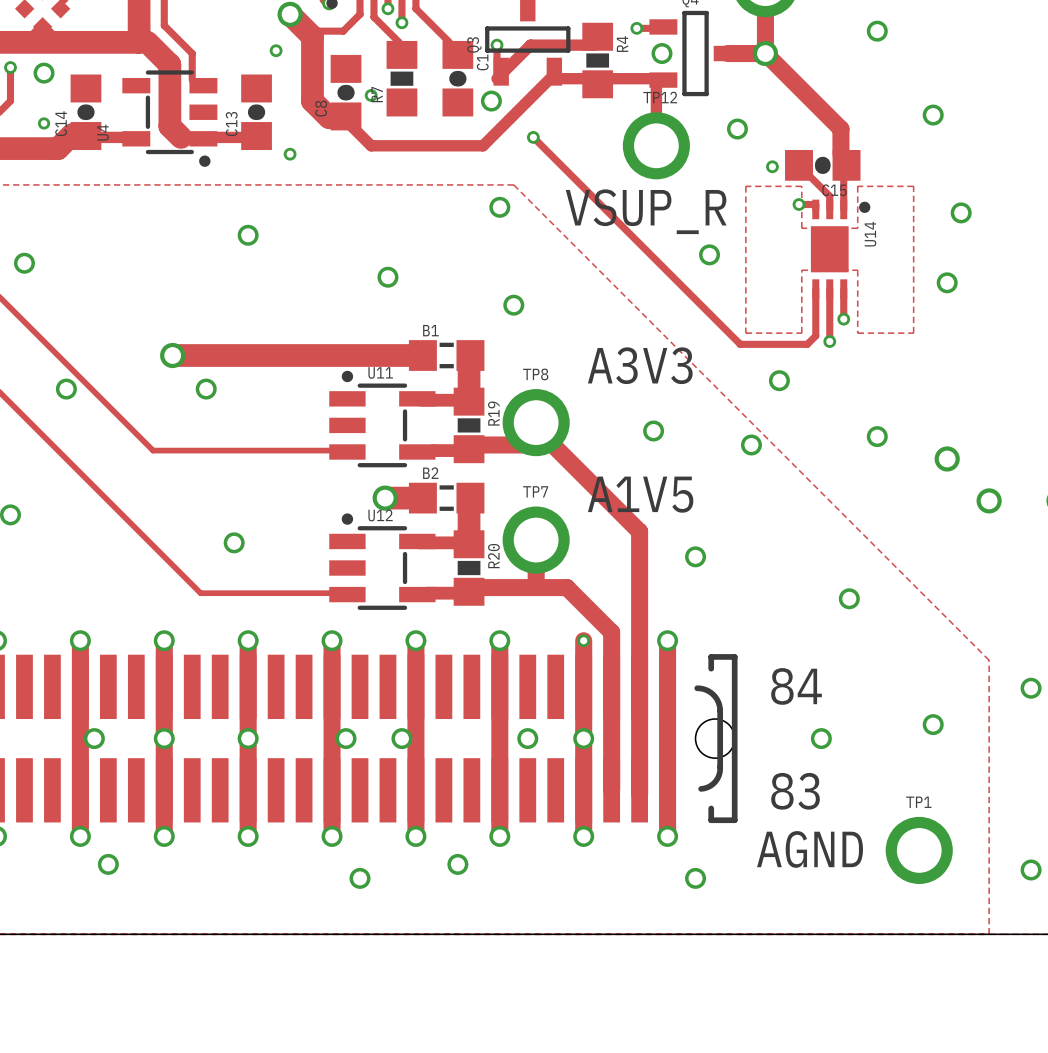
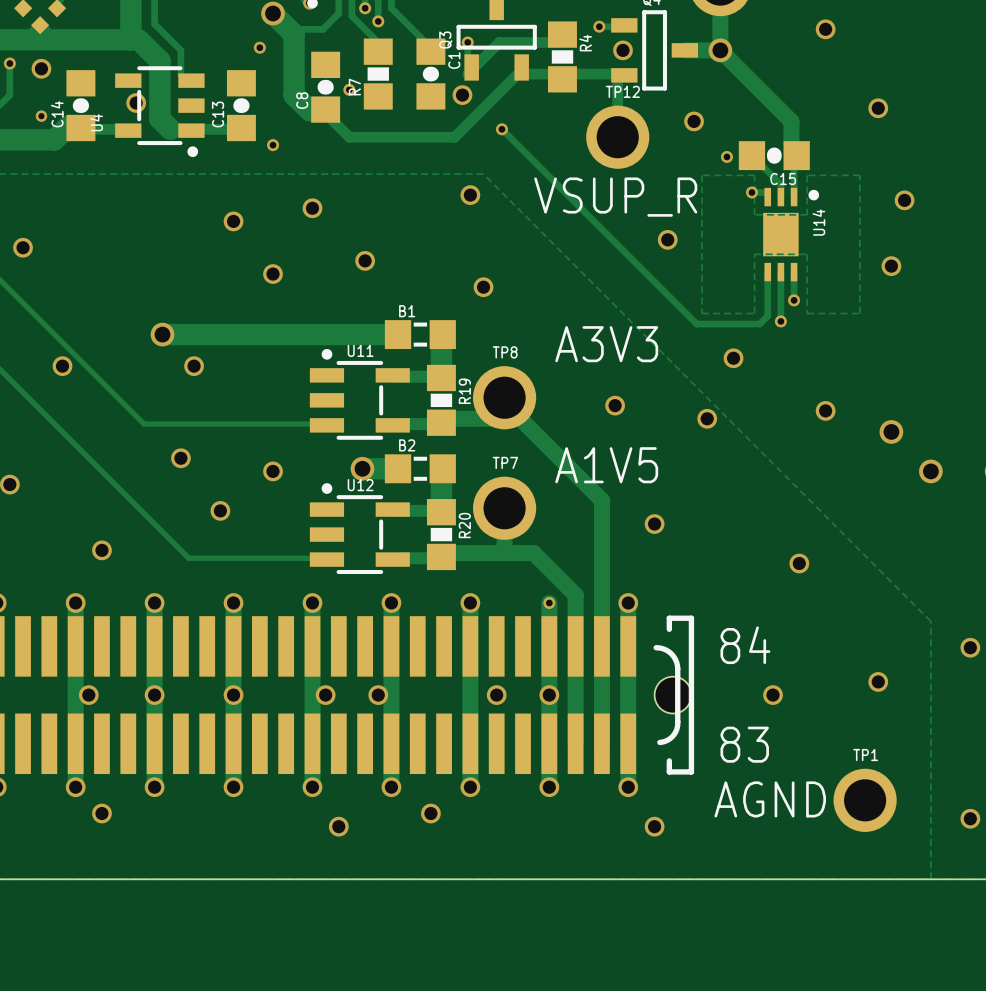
via: none -> (136, 103)
via: none -> (312, 208)
via: none -> (273, 274)
via: none -> (180, 458)
via: none -> (273, 471)
via: none -> (101, 550)

